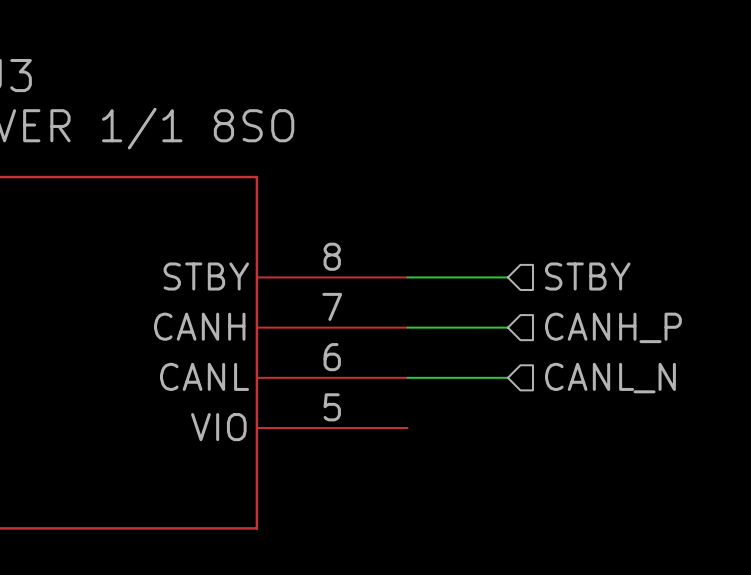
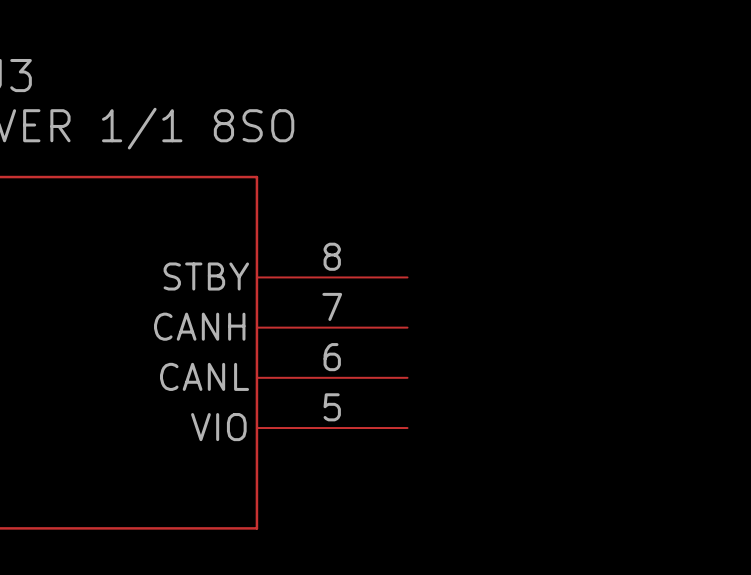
hierarchical label: STBY (587, 276) -> none
wire: (407, 277) (507, 277) -> none
wire: (407, 327) (507, 327) -> none
hierarchical label: CANH_P (613, 327) -> none
wire: (407, 377) (507, 377) -> none
hierarchical label: CANL_N (610, 378) -> none

